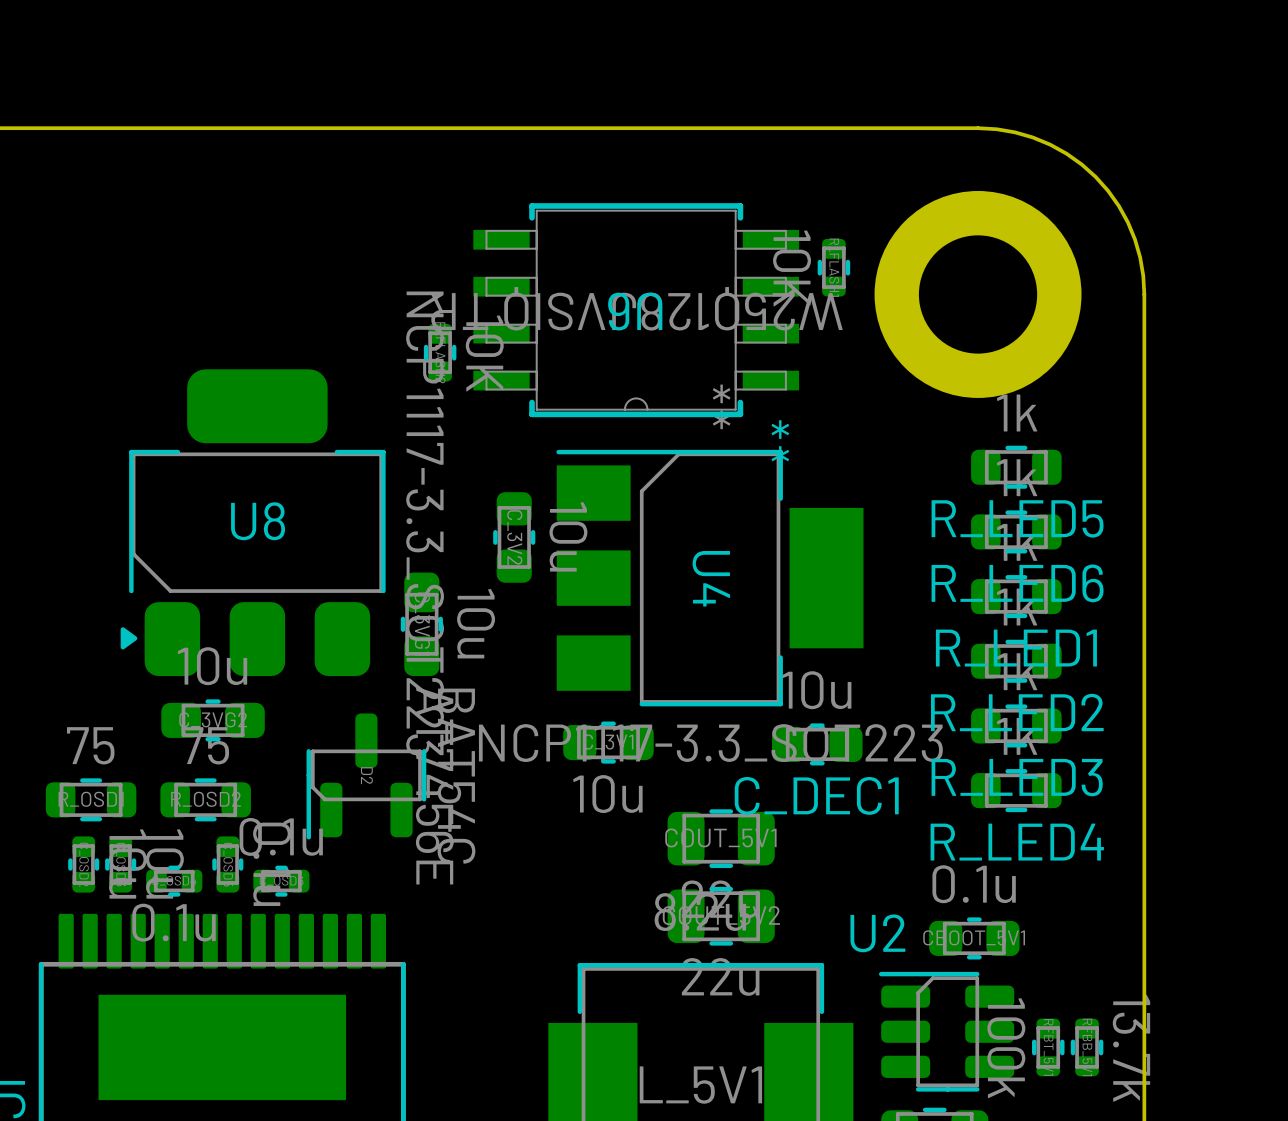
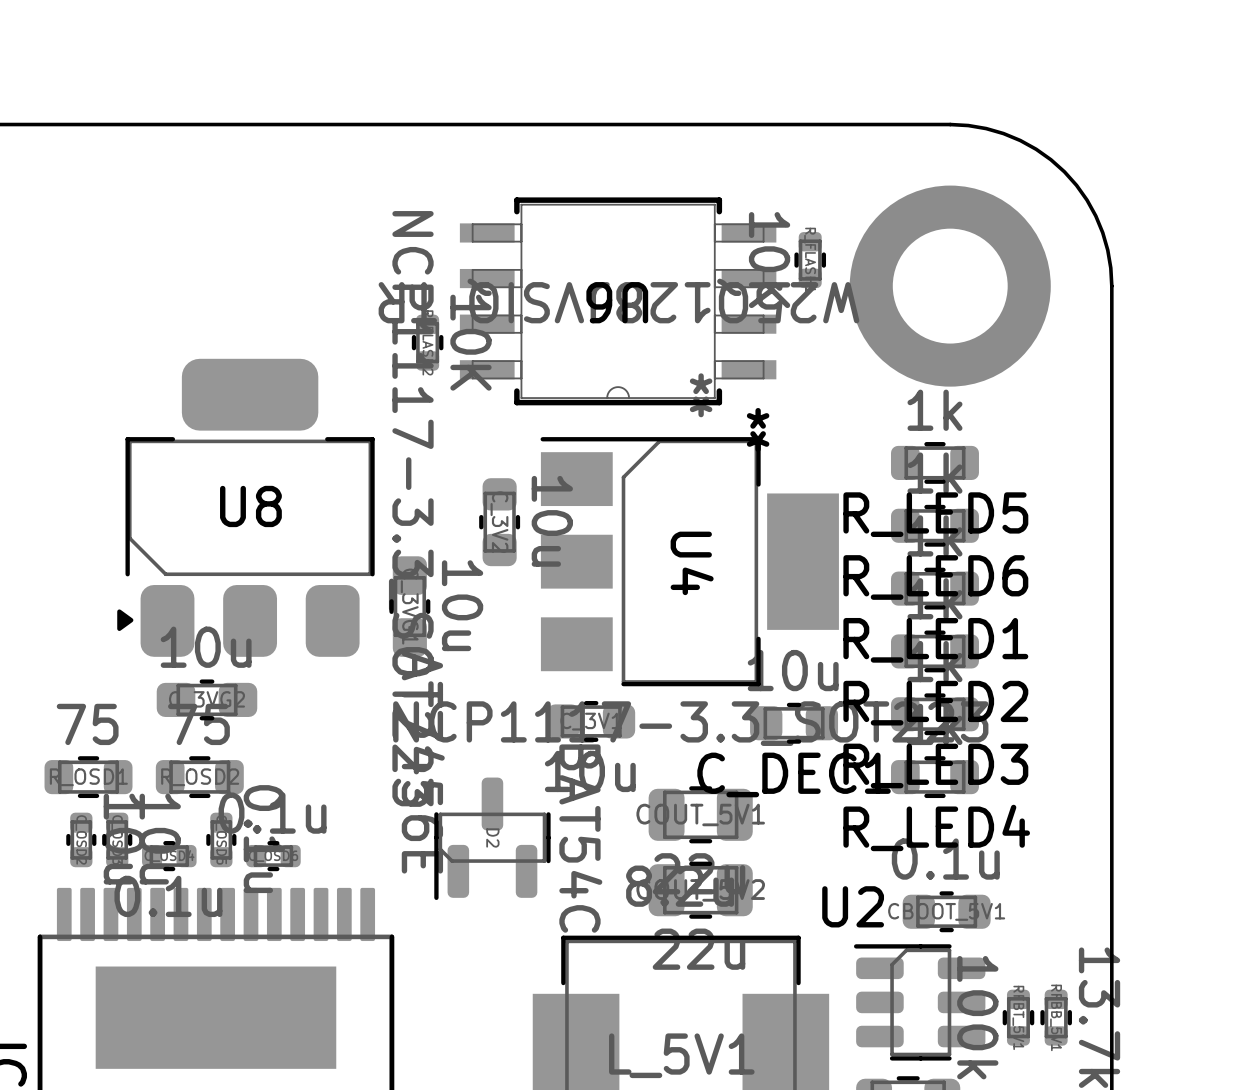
R_LED5 position: (1016, 467) -> (934, 462)
R_LED6 position: (1016, 531) -> (934, 525)
R_LED1 position: (1016, 596) -> (934, 588)
R_LED2 position: (1016, 661) -> (934, 651)
R_LED3 position: (1016, 725) -> (934, 714)
D2 position: (366, 776) -> (492, 838)
R_LED4 position: (1016, 790) -> (934, 777)

